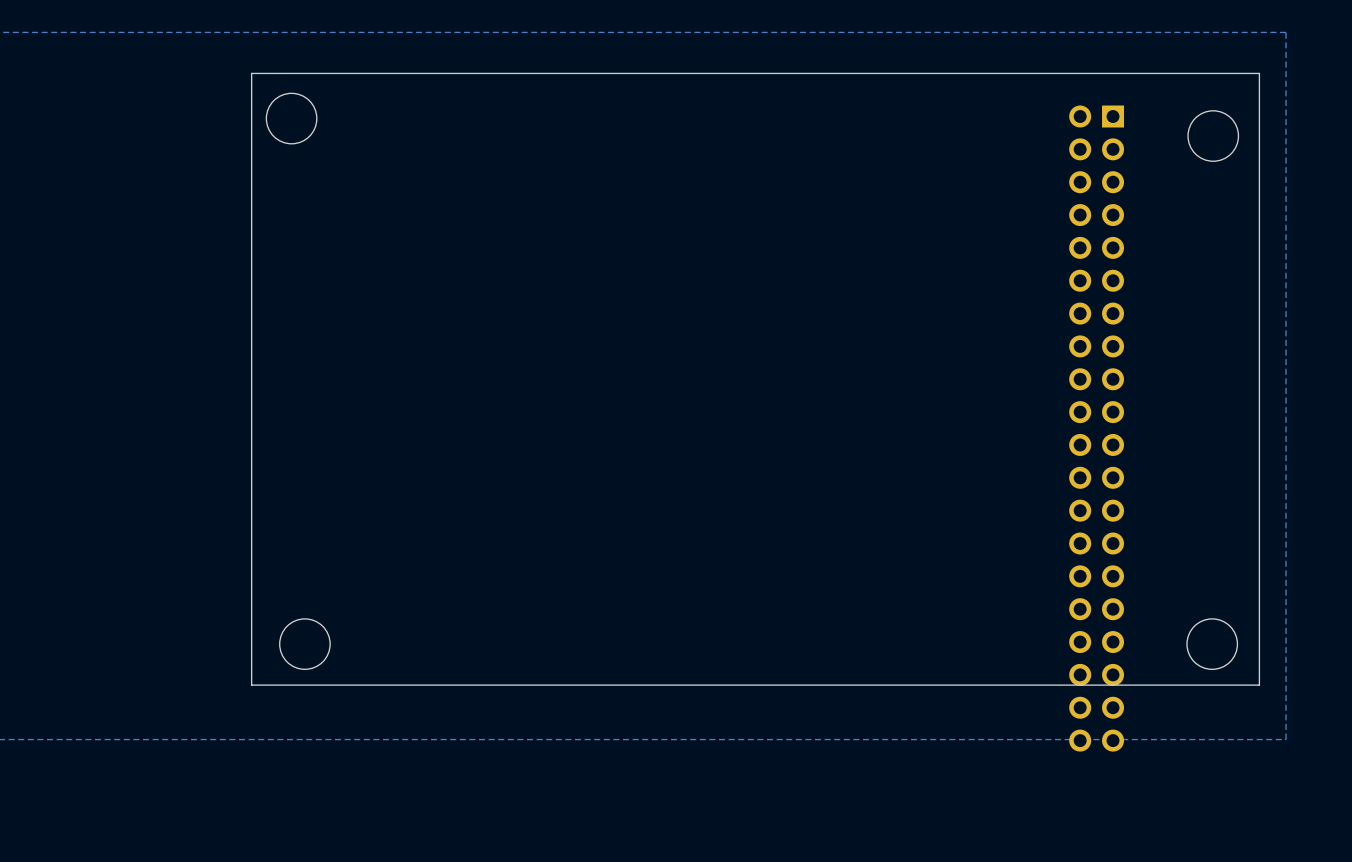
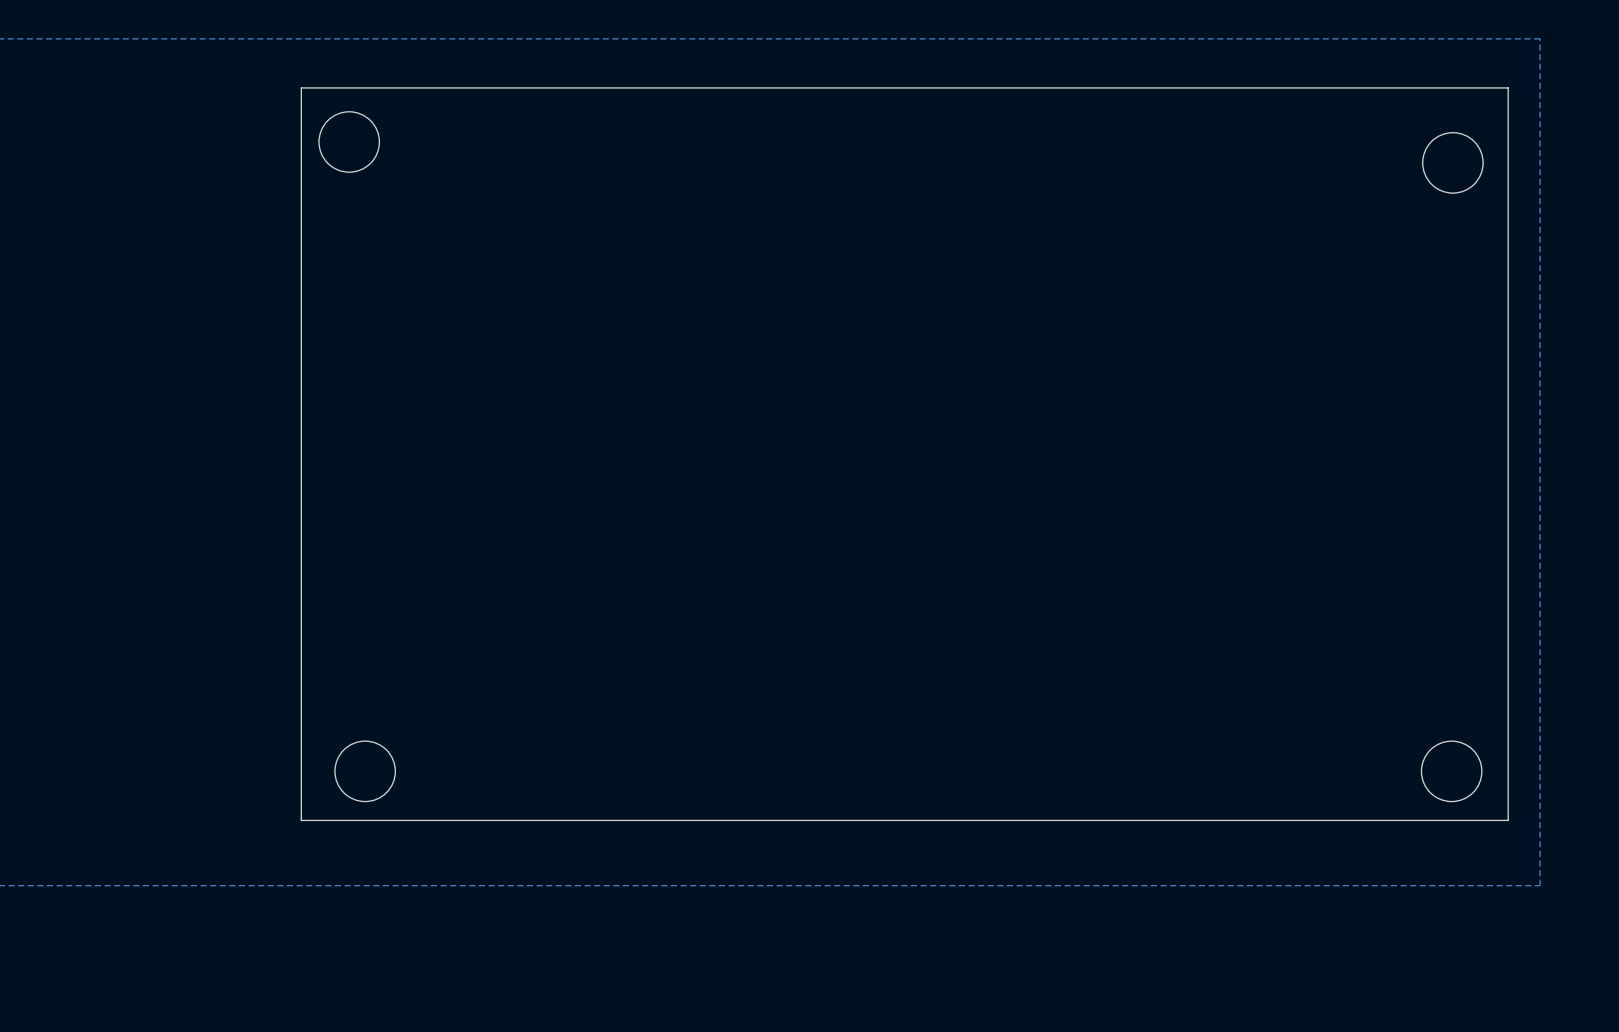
part: (1096, 428) -> none

